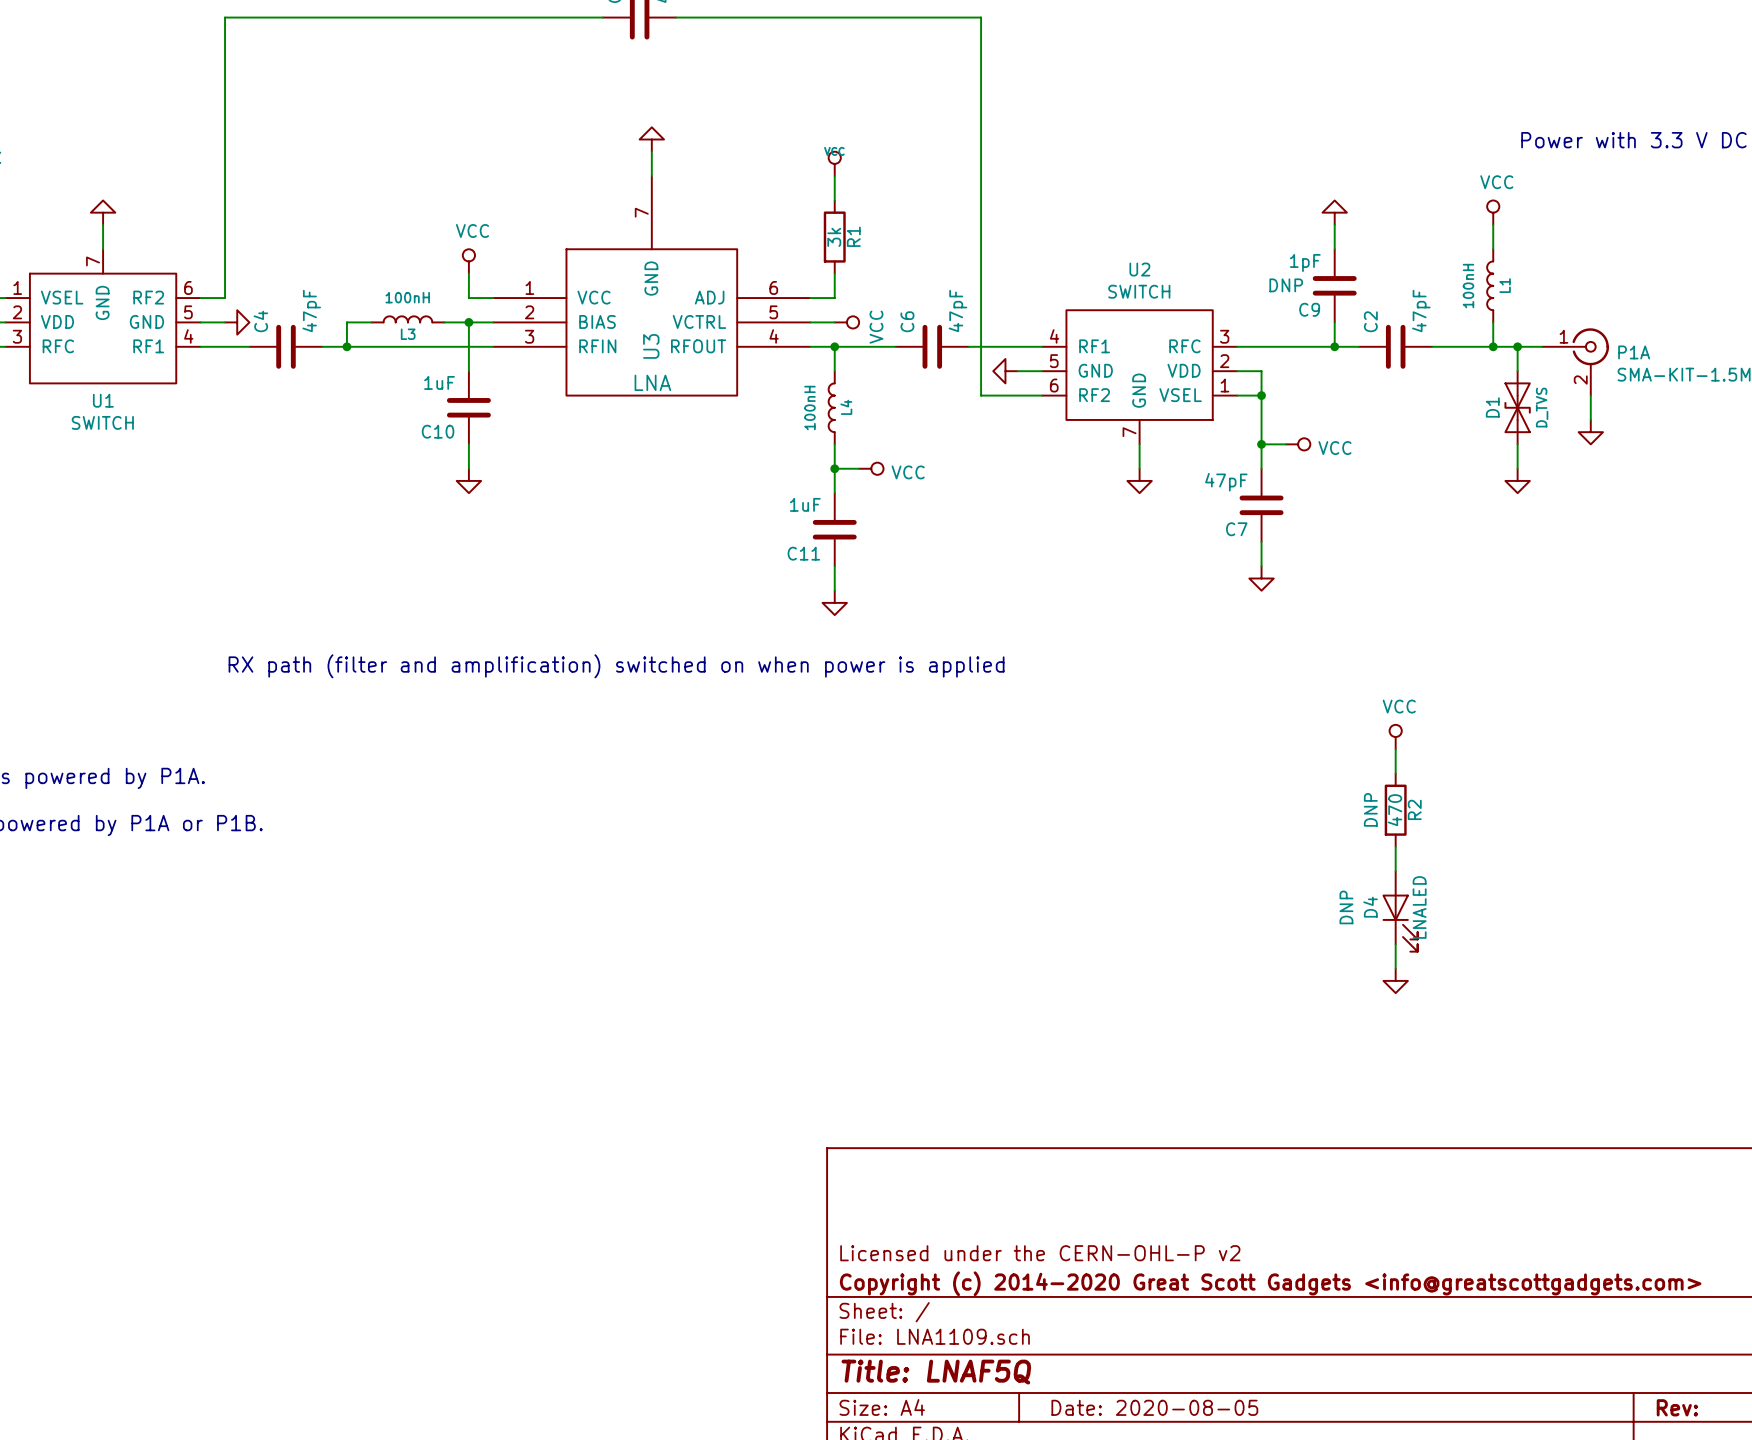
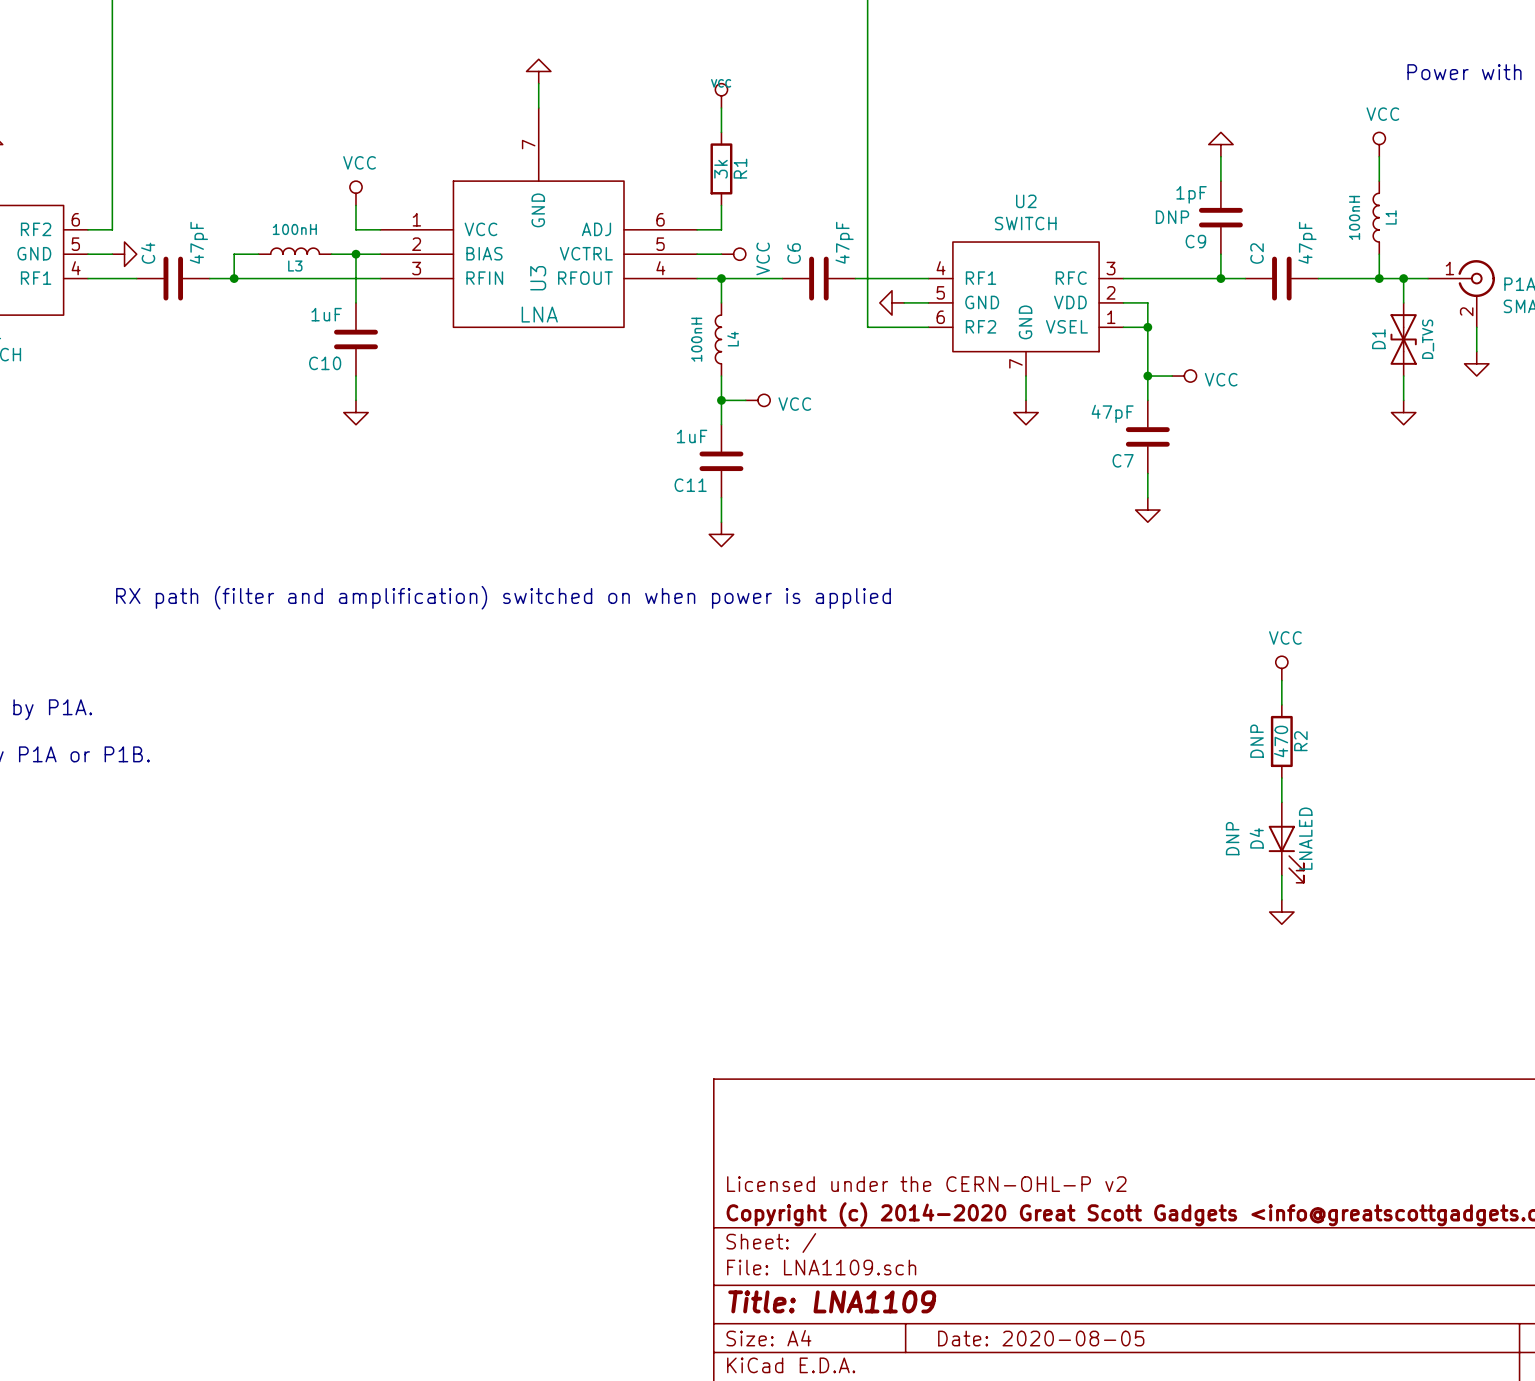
title block: Title: LNAF5Q (936, 1372) -> Title: LNA1109 (832, 1301)

